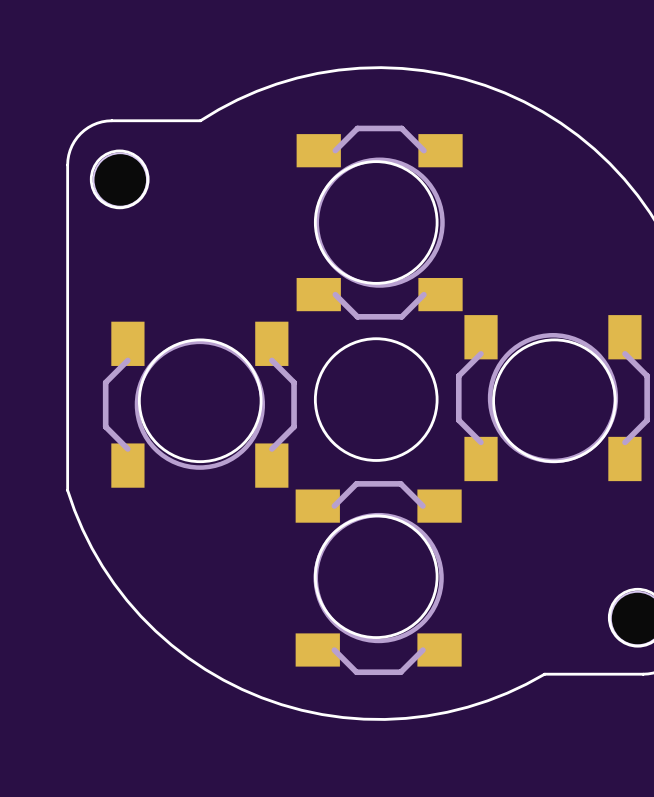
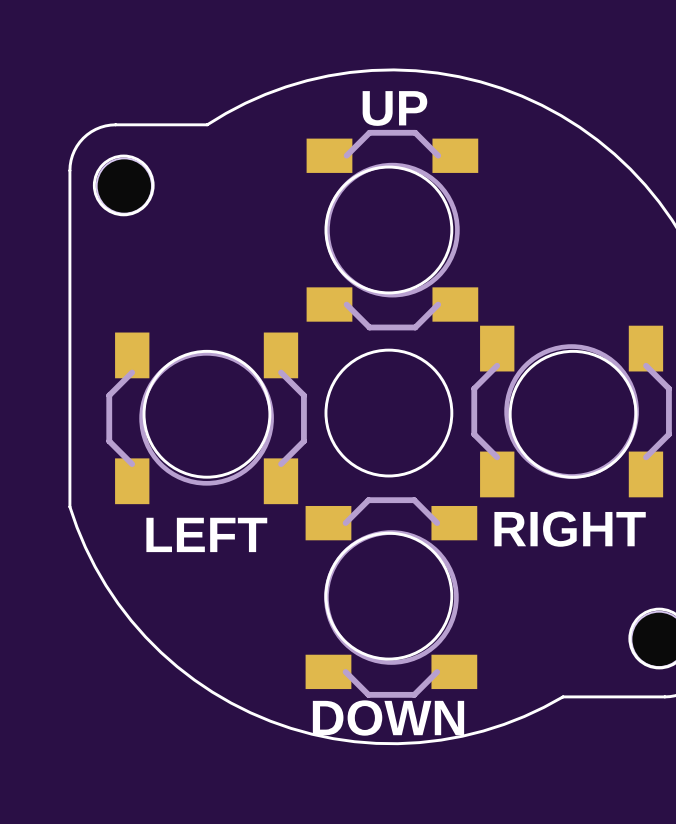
text: none -> UP (394, 108)
text: none -> RIGHT (570, 529)
text: none -> LEFT (206, 534)
text: none -> DOWN (388, 718)

